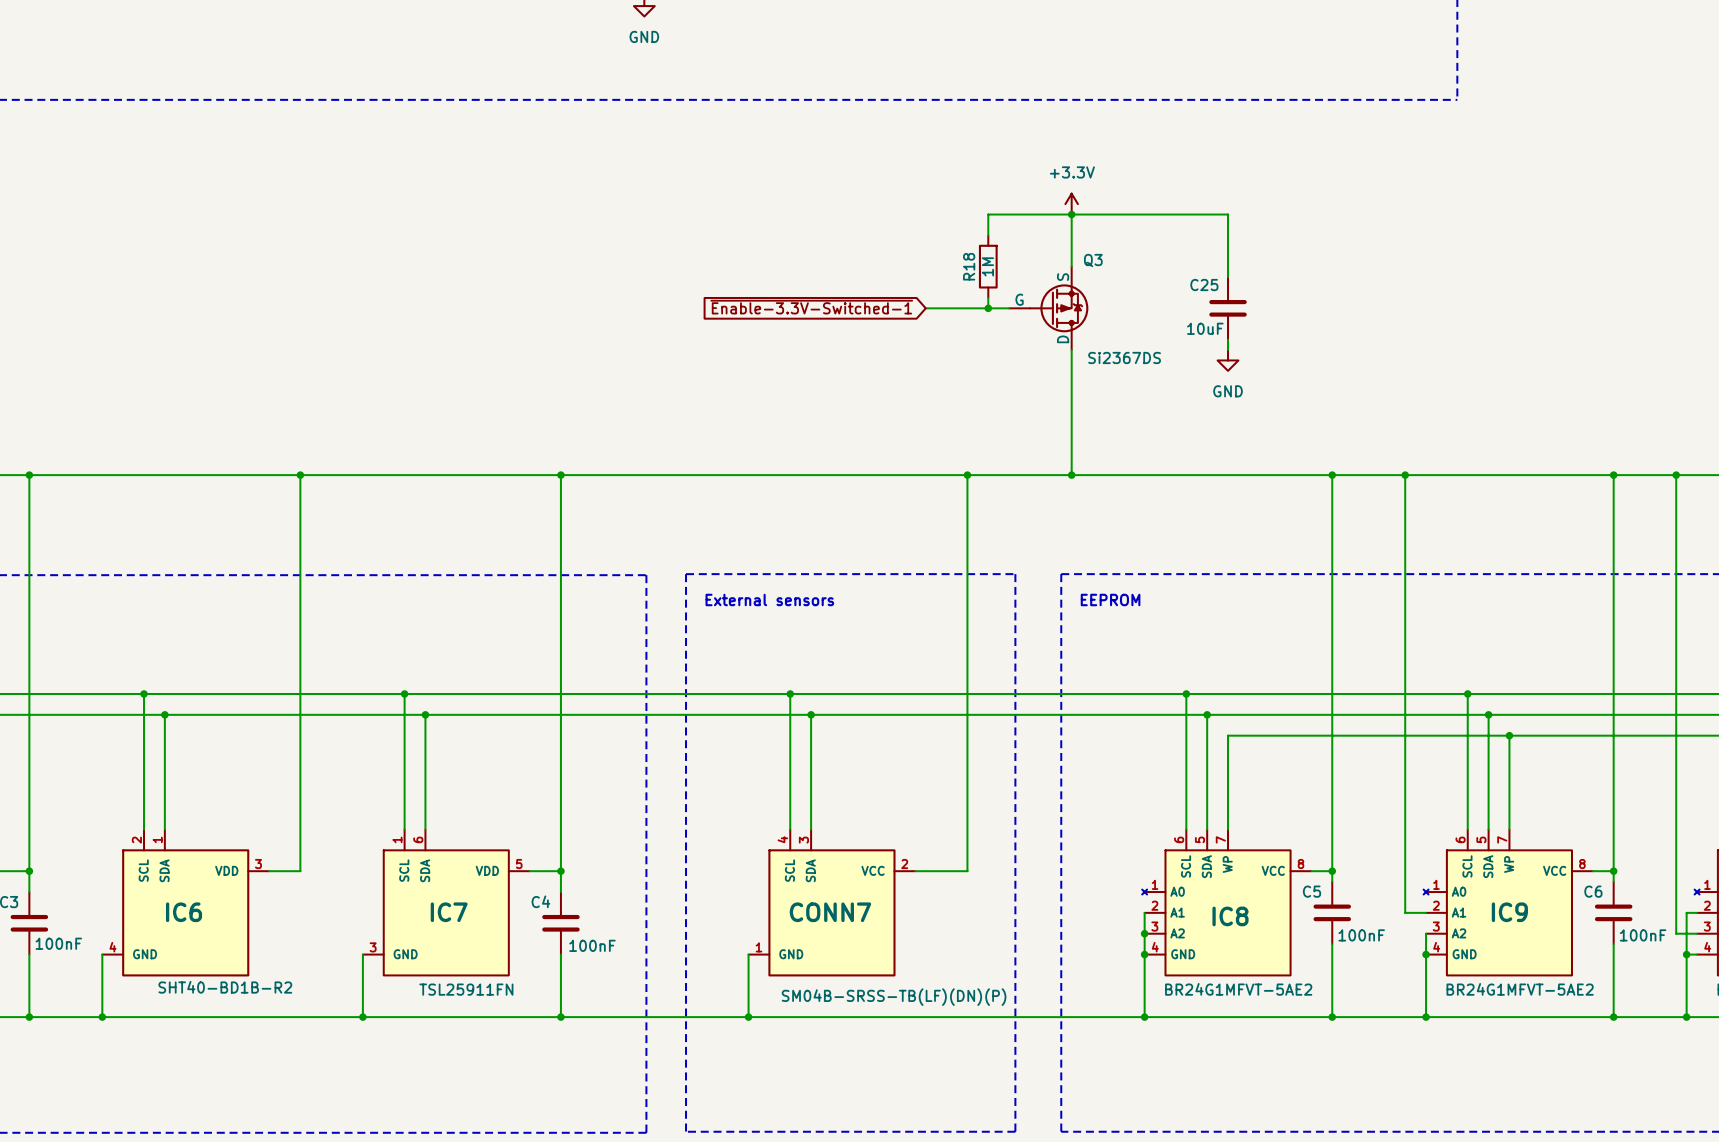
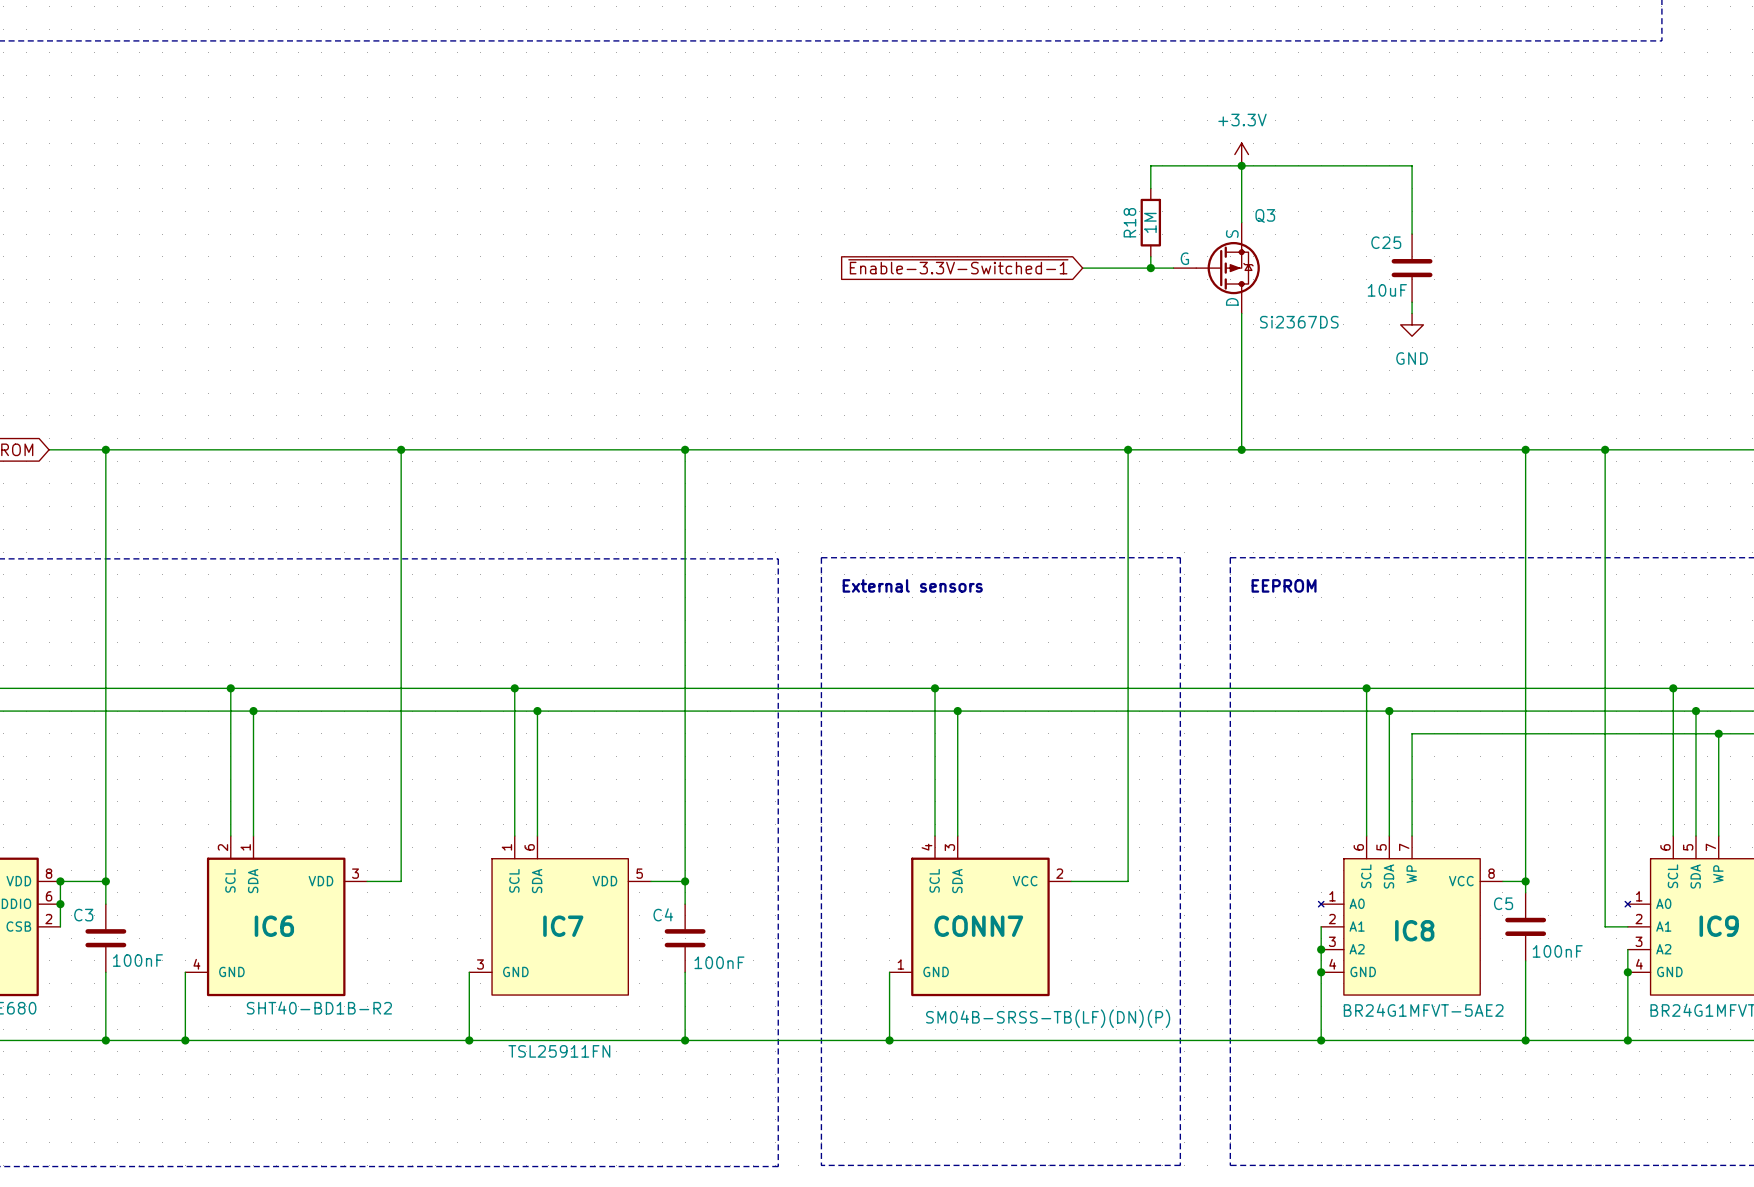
IC7 value position: TSL25911FN (466, 989) -> TSL25911FN (559, 1051)

